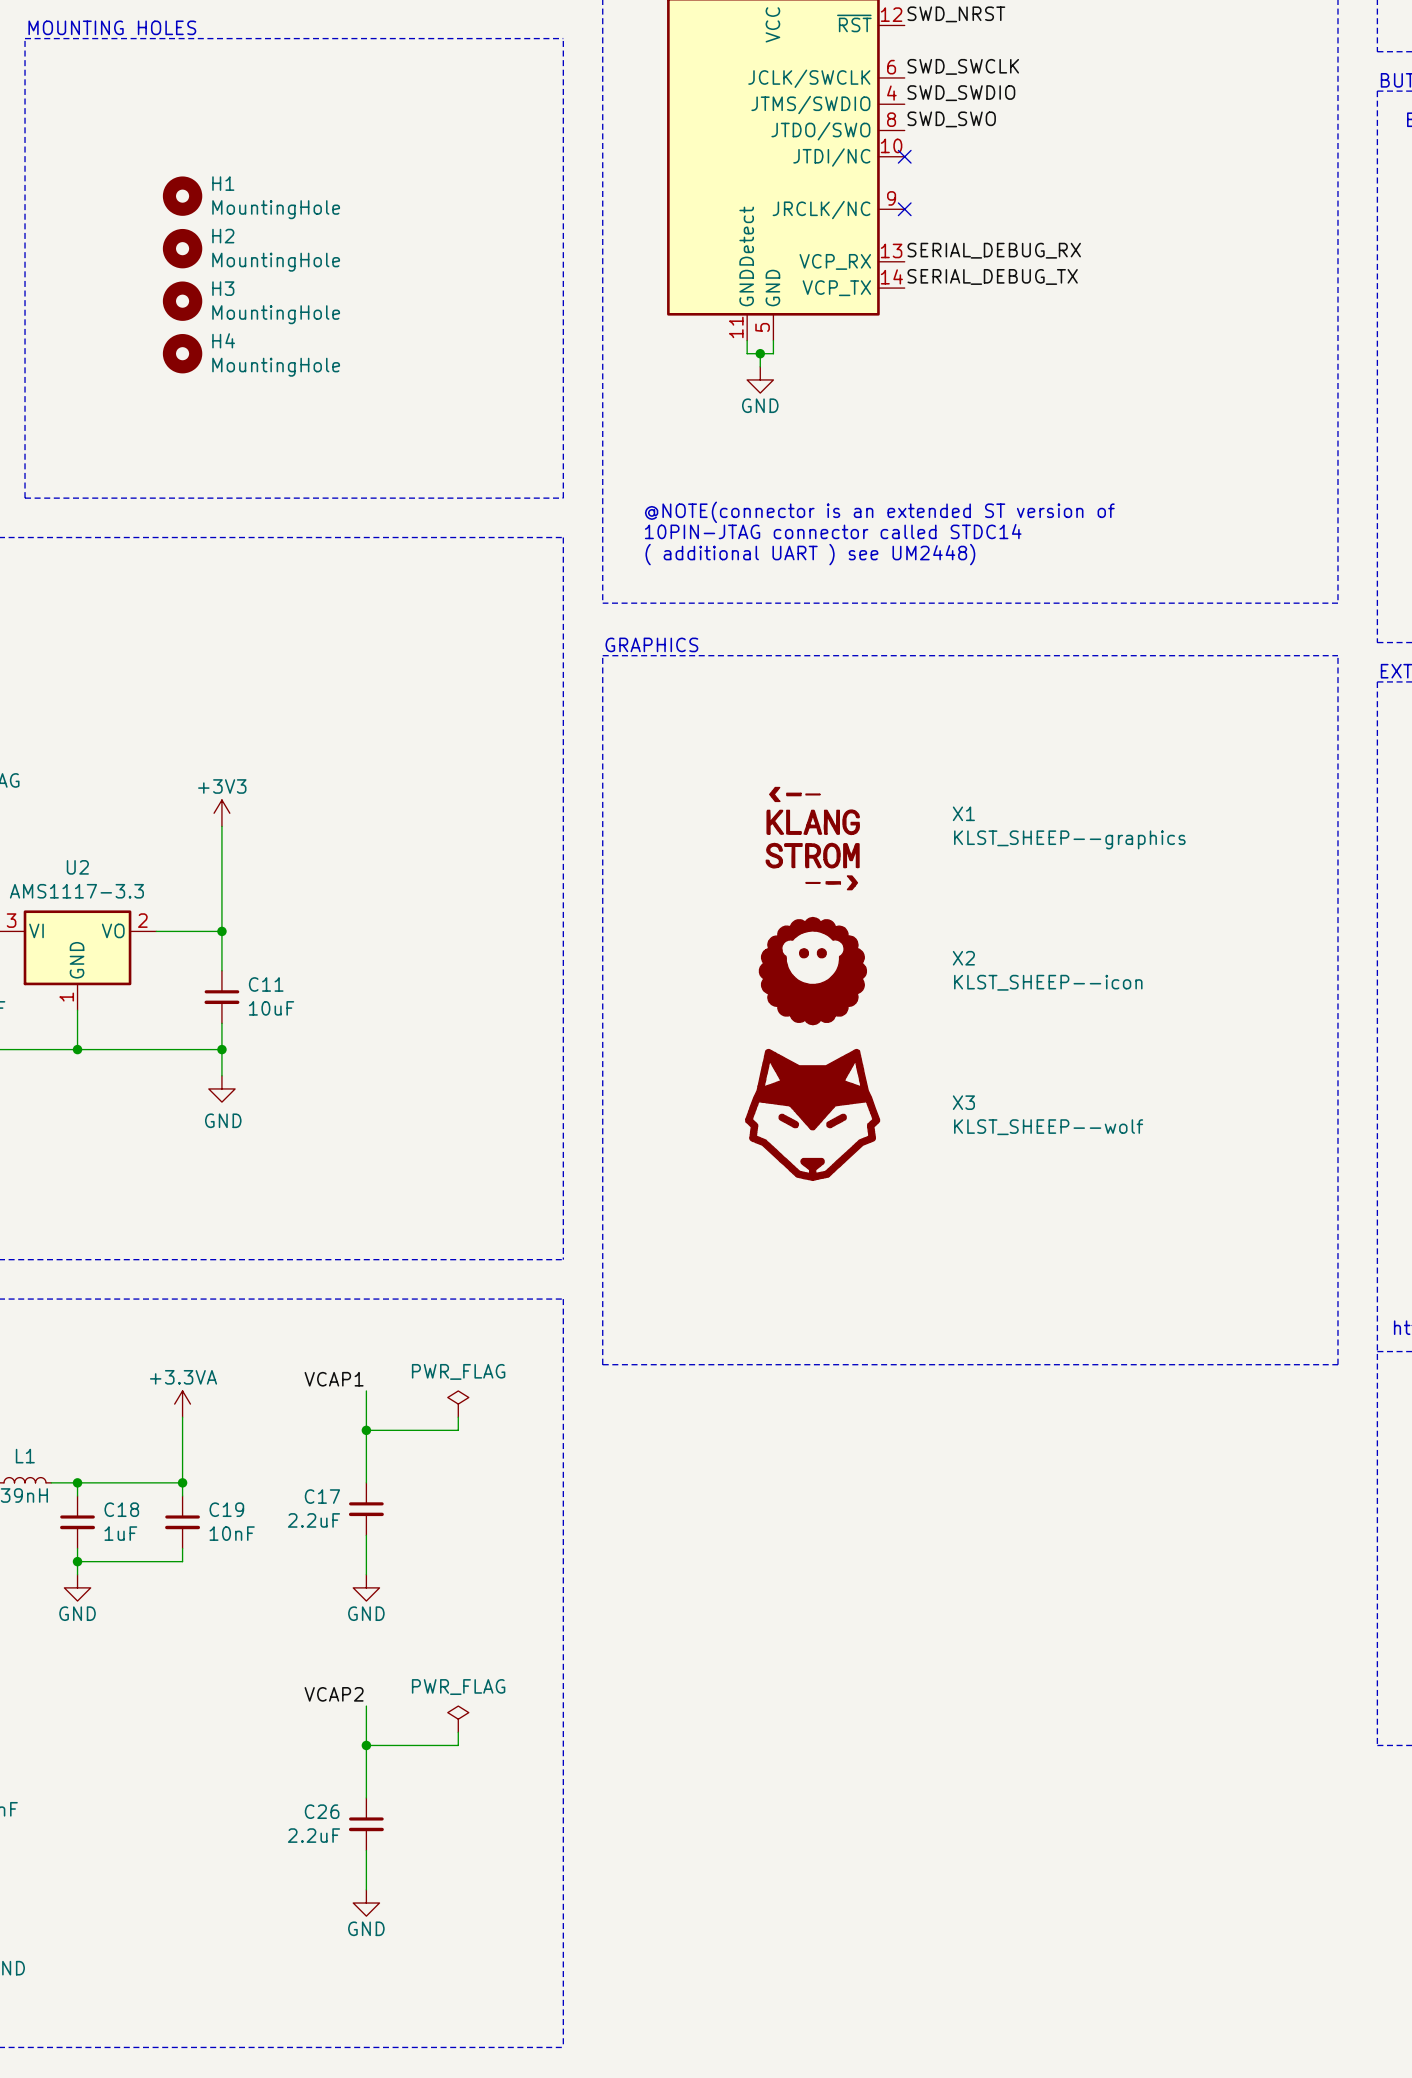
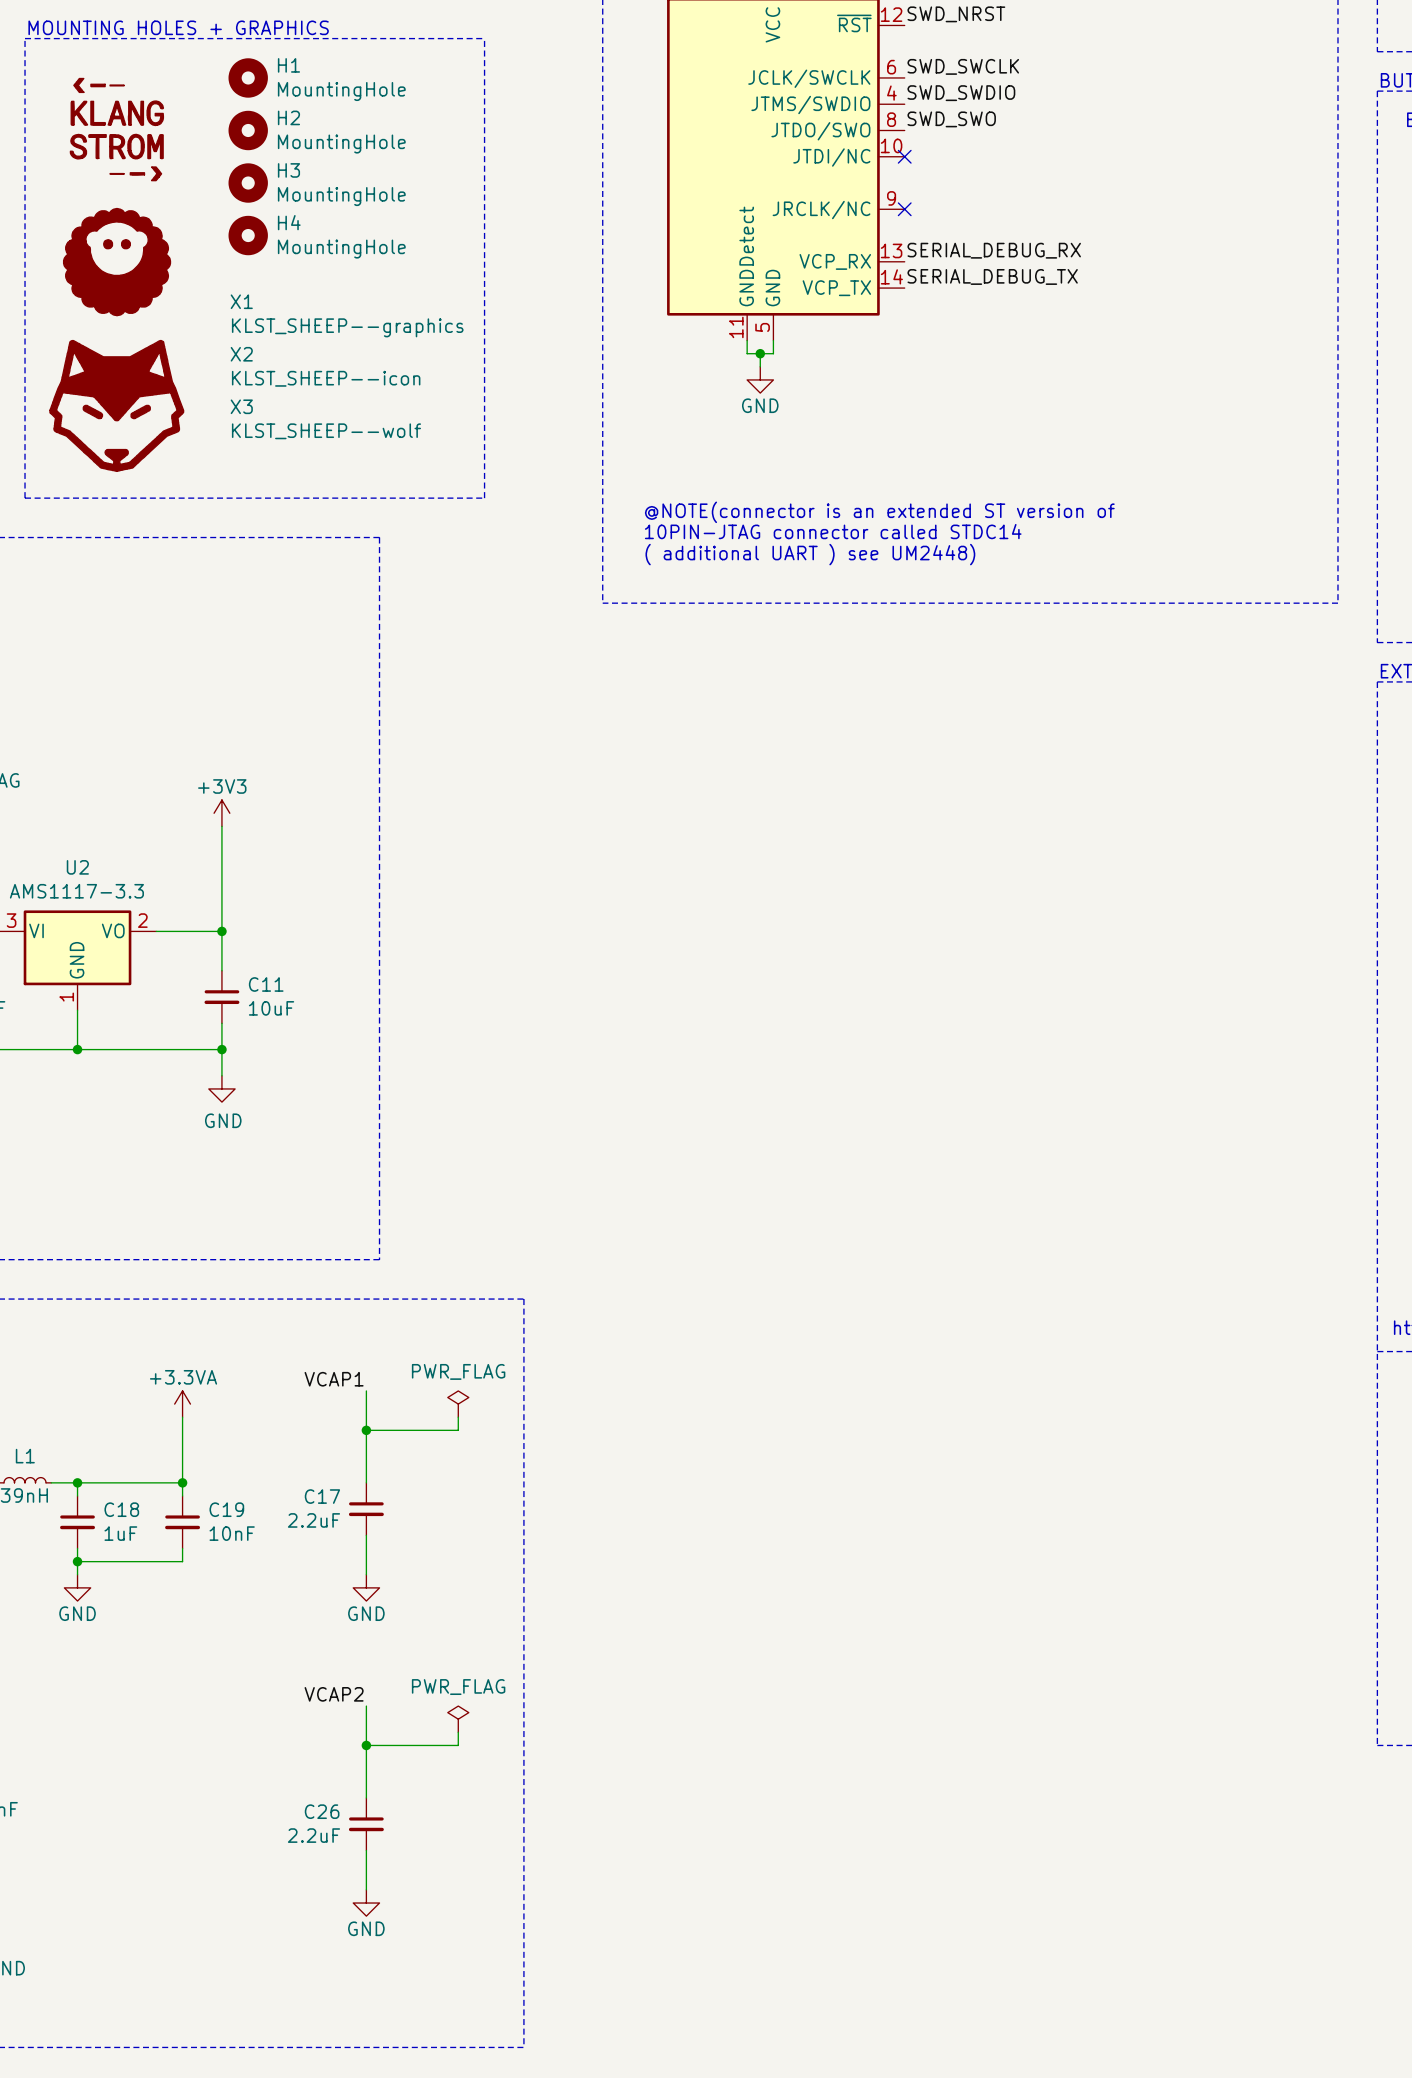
text: MOUNTING HOLES (112, 27) -> MOUNTING HOLES + GRAPHICS (178, 27)
line: (484, 38) (563, 38) (563, 498) (484, 498) -> (484, 38) (484, 498)
power symbol: none -> (116, 129)
H1 position: (182, 196) -> (248, 77)
H2 position: (182, 248) -> (248, 130)
power symbol: none -> (117, 262)
H3 position: (182, 301) -> (248, 183)
H4 position: (182, 353) -> (248, 235)
power symbol: none -> (116, 405)
line: (379, 537) (563, 537) (563, 1259) (379, 1259) -> (379, 537) (379, 1259)
text: GRAPHICS (651, 644) -> none
line: (602, 655) (1337, 655) (1337, 1364) (602, 1364) (602, 655) -> none
X1 position: (1069, 827) -> (347, 315)
power symbol: (812, 838) -> none
X2 position: (1047, 970) -> (325, 366)
power symbol: (812, 971) -> none
power symbol: (812, 1114) -> none
X3 position: (1047, 1115) -> (325, 419)
line: (523, 1299) (563, 1299) (563, 2047) (523, 2047) -> (523, 1299) (523, 2047)

